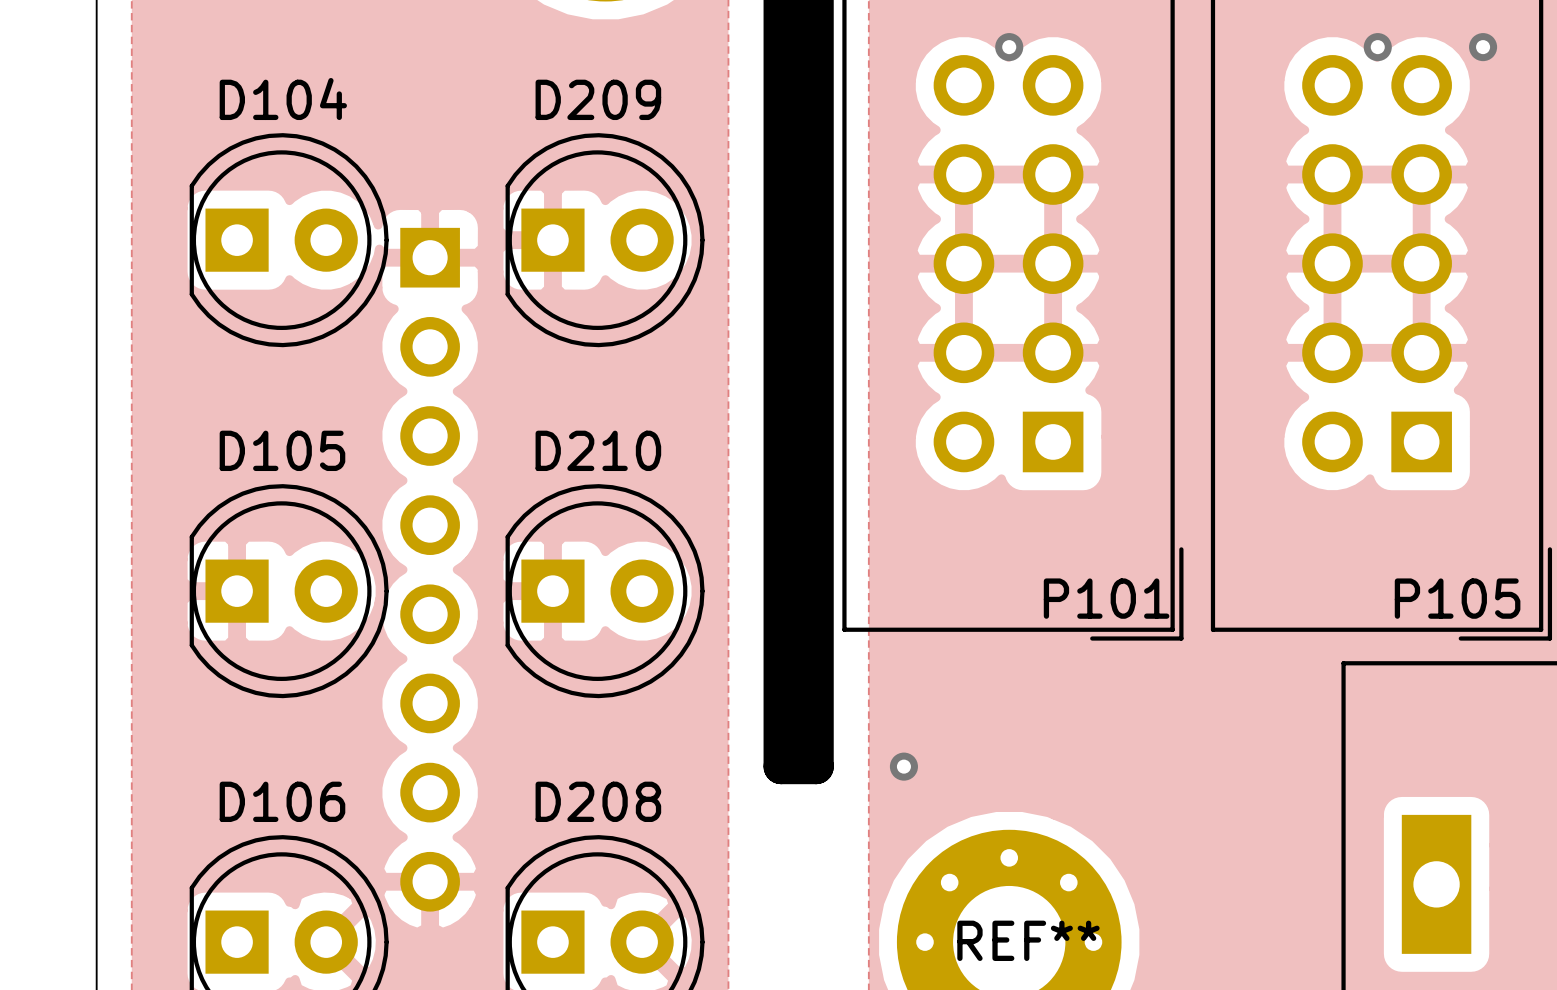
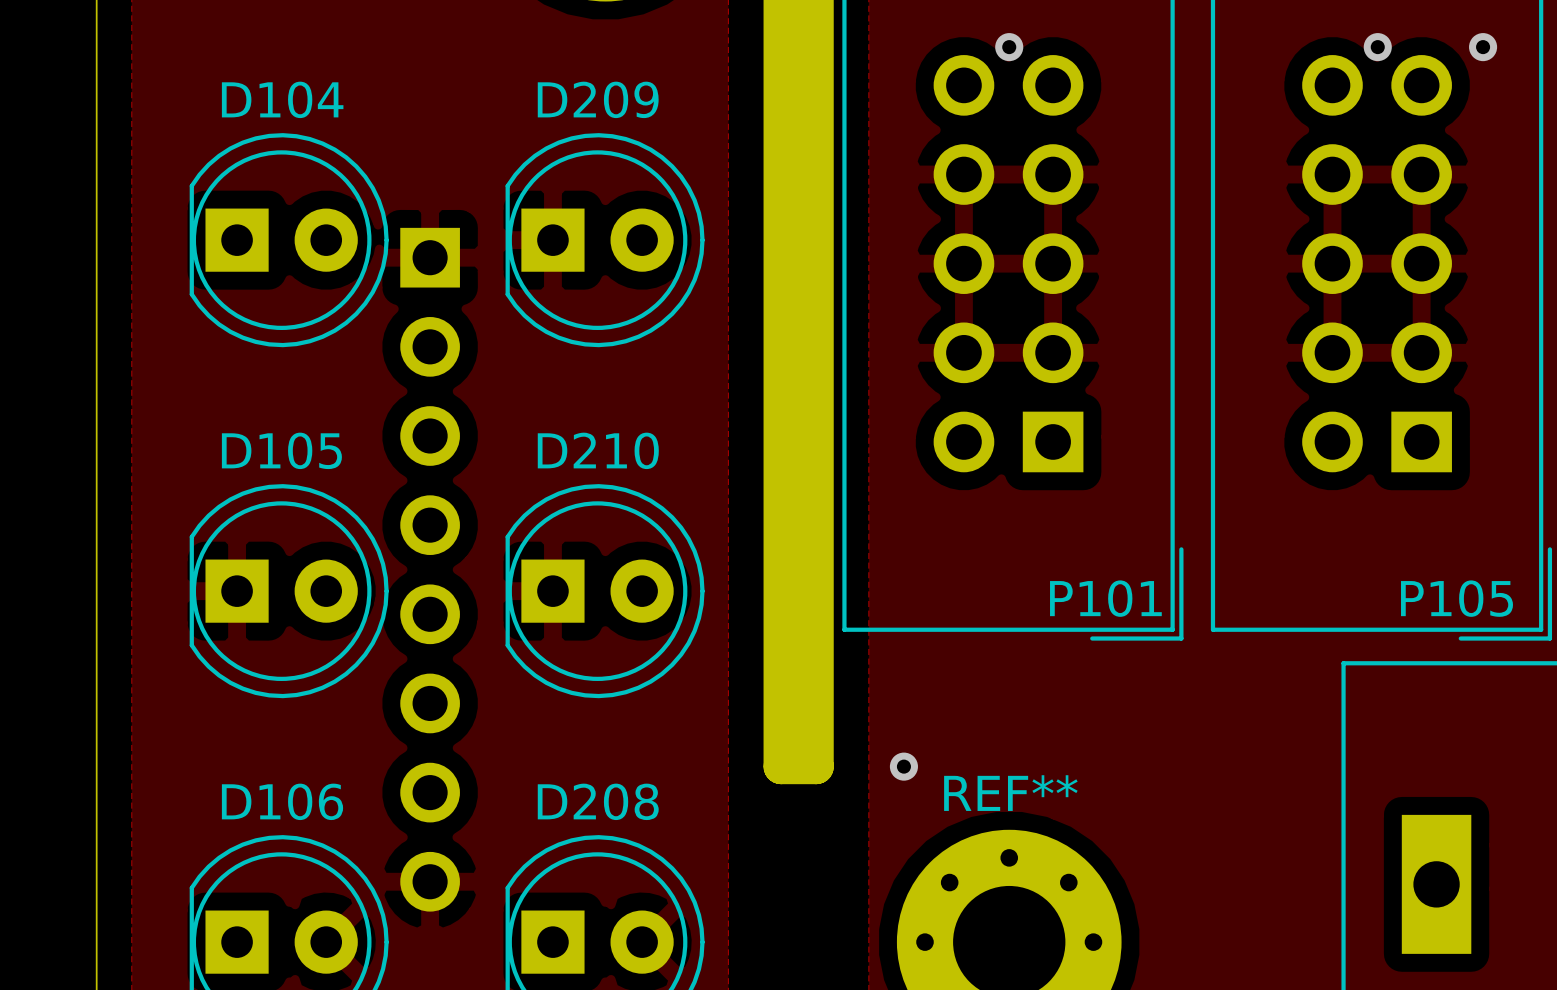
REF** name position: REF** (1028, 940) -> REF** (1010, 793)

